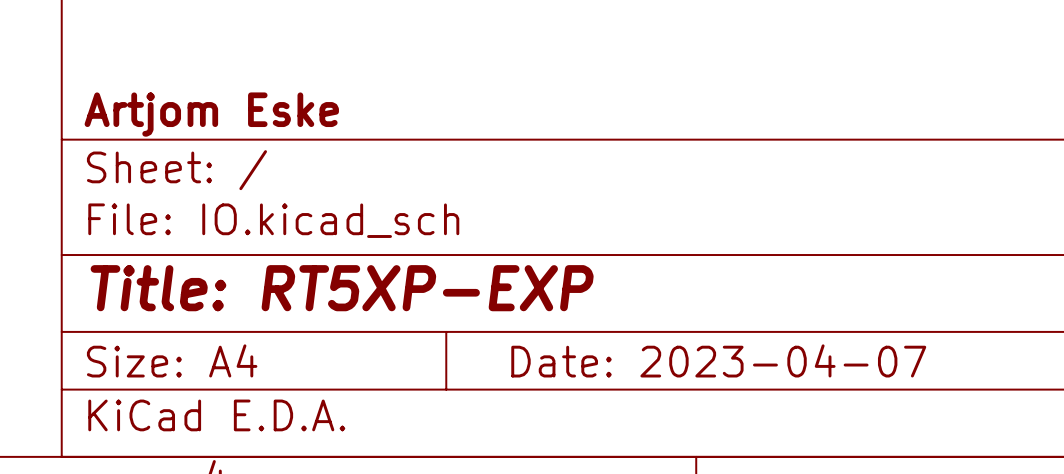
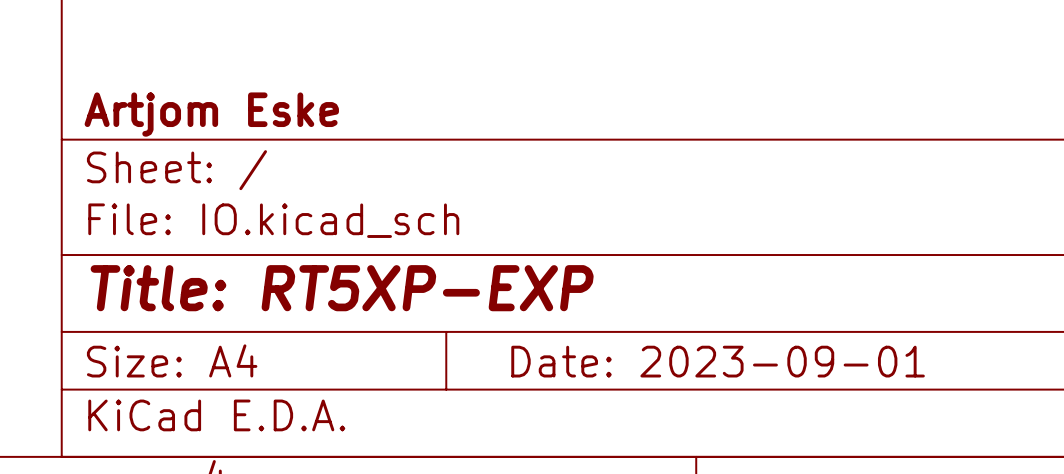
title block: Date: 2023-04-07 (718, 360) -> Date: 2023-09-01 (718, 361)

